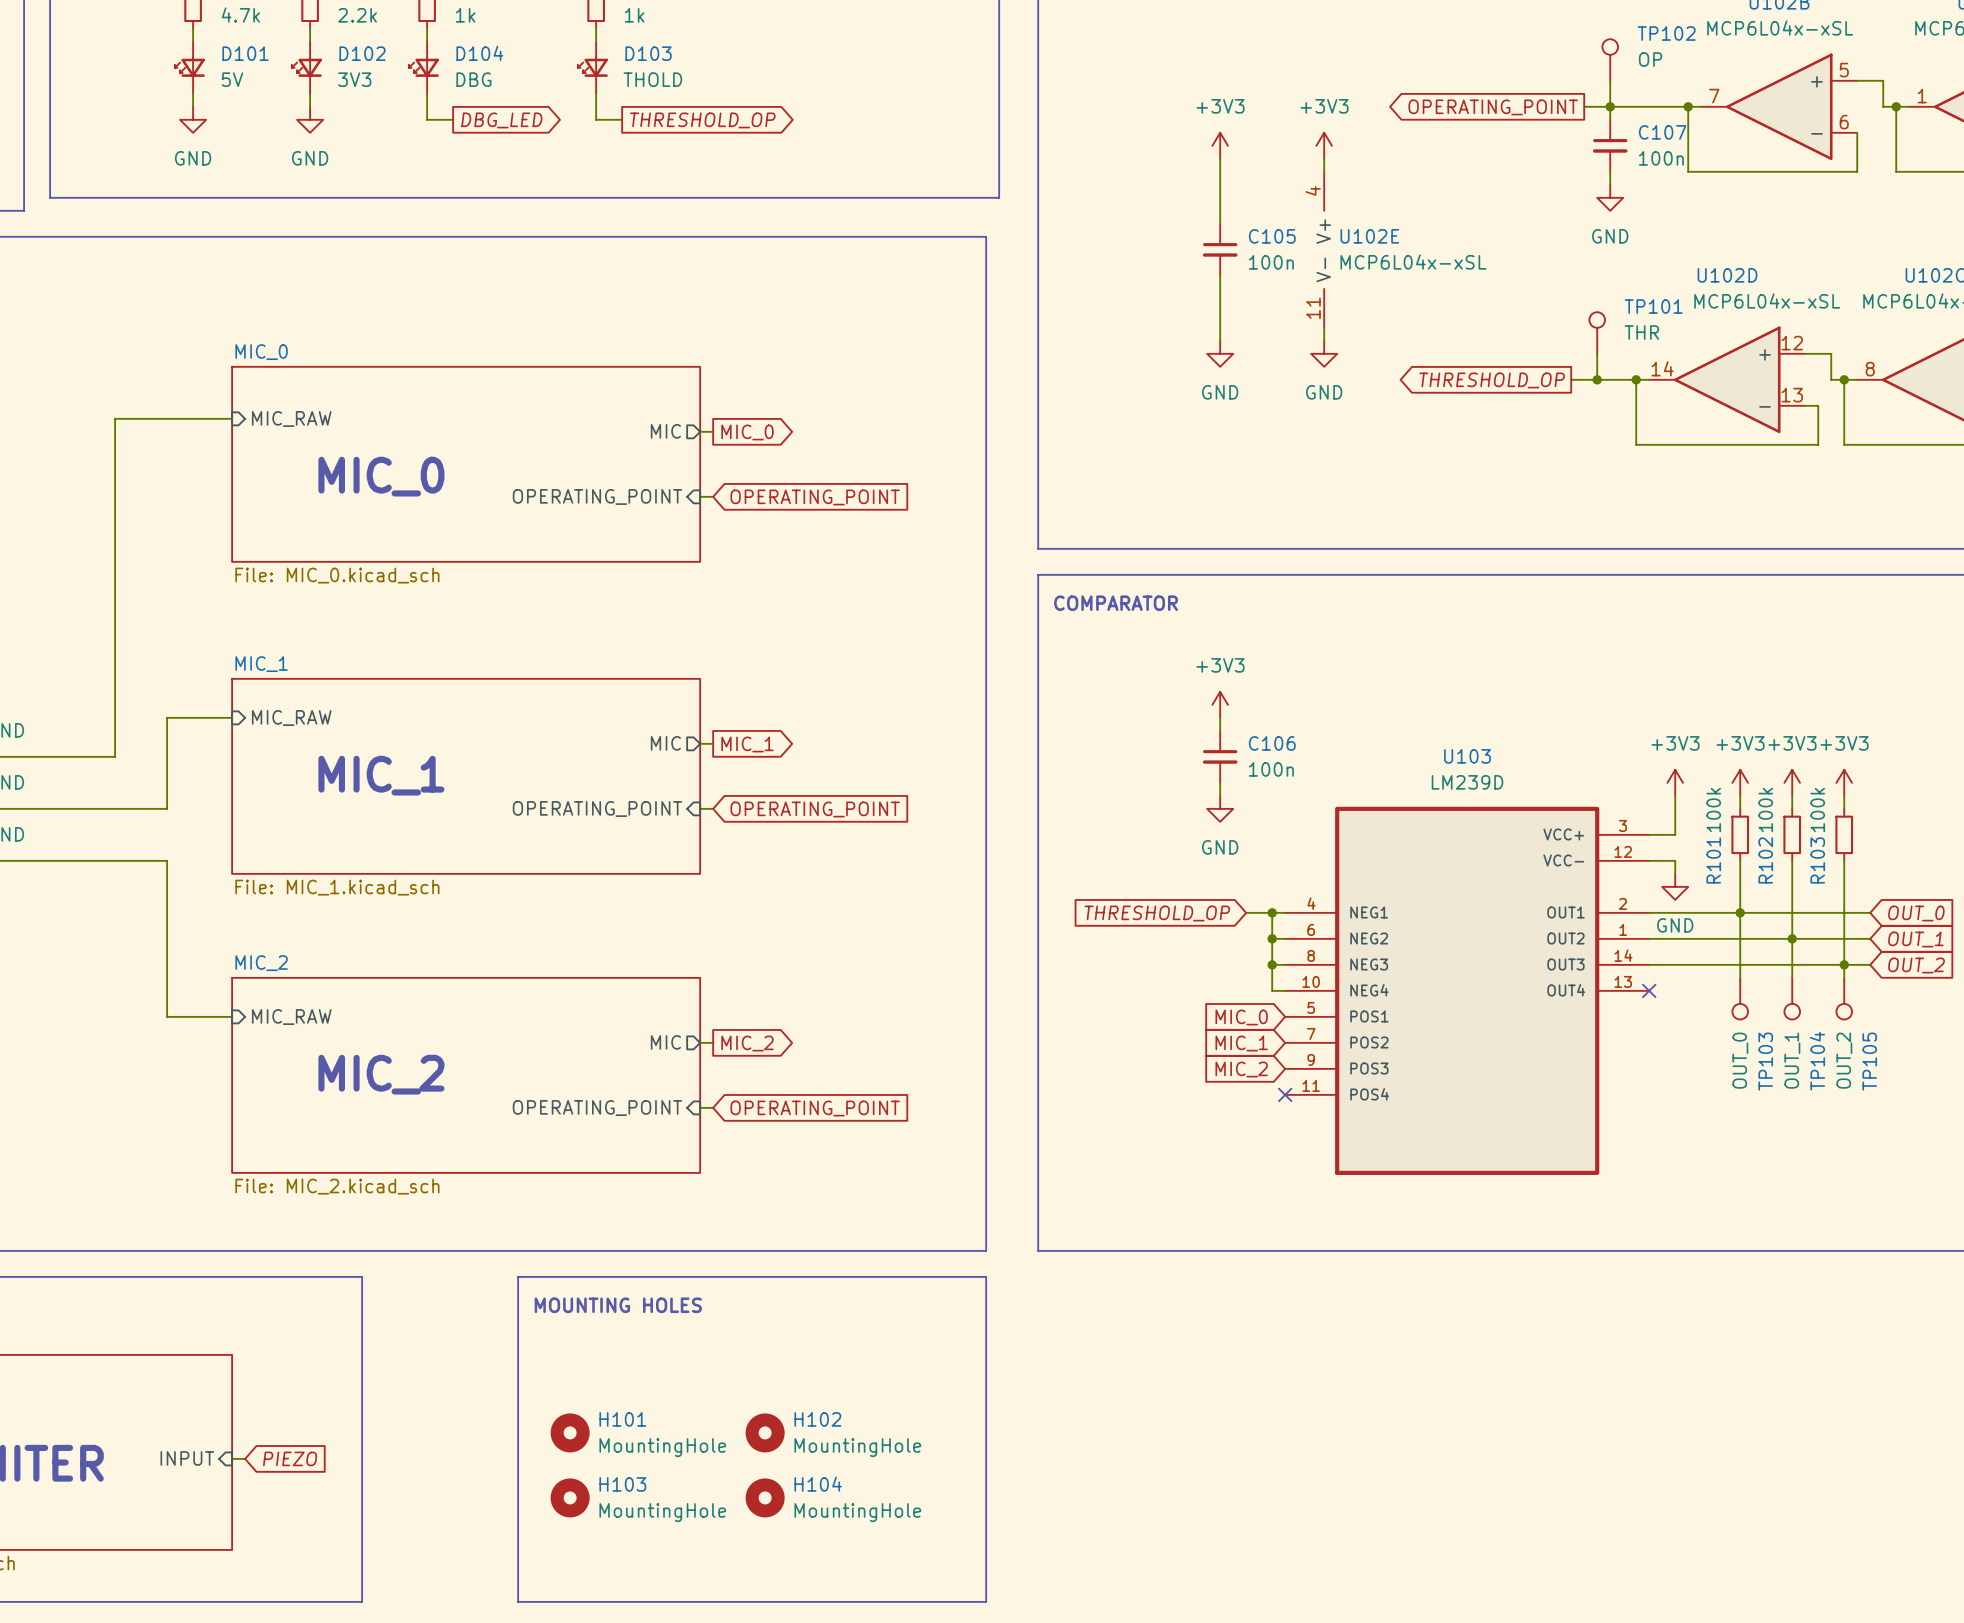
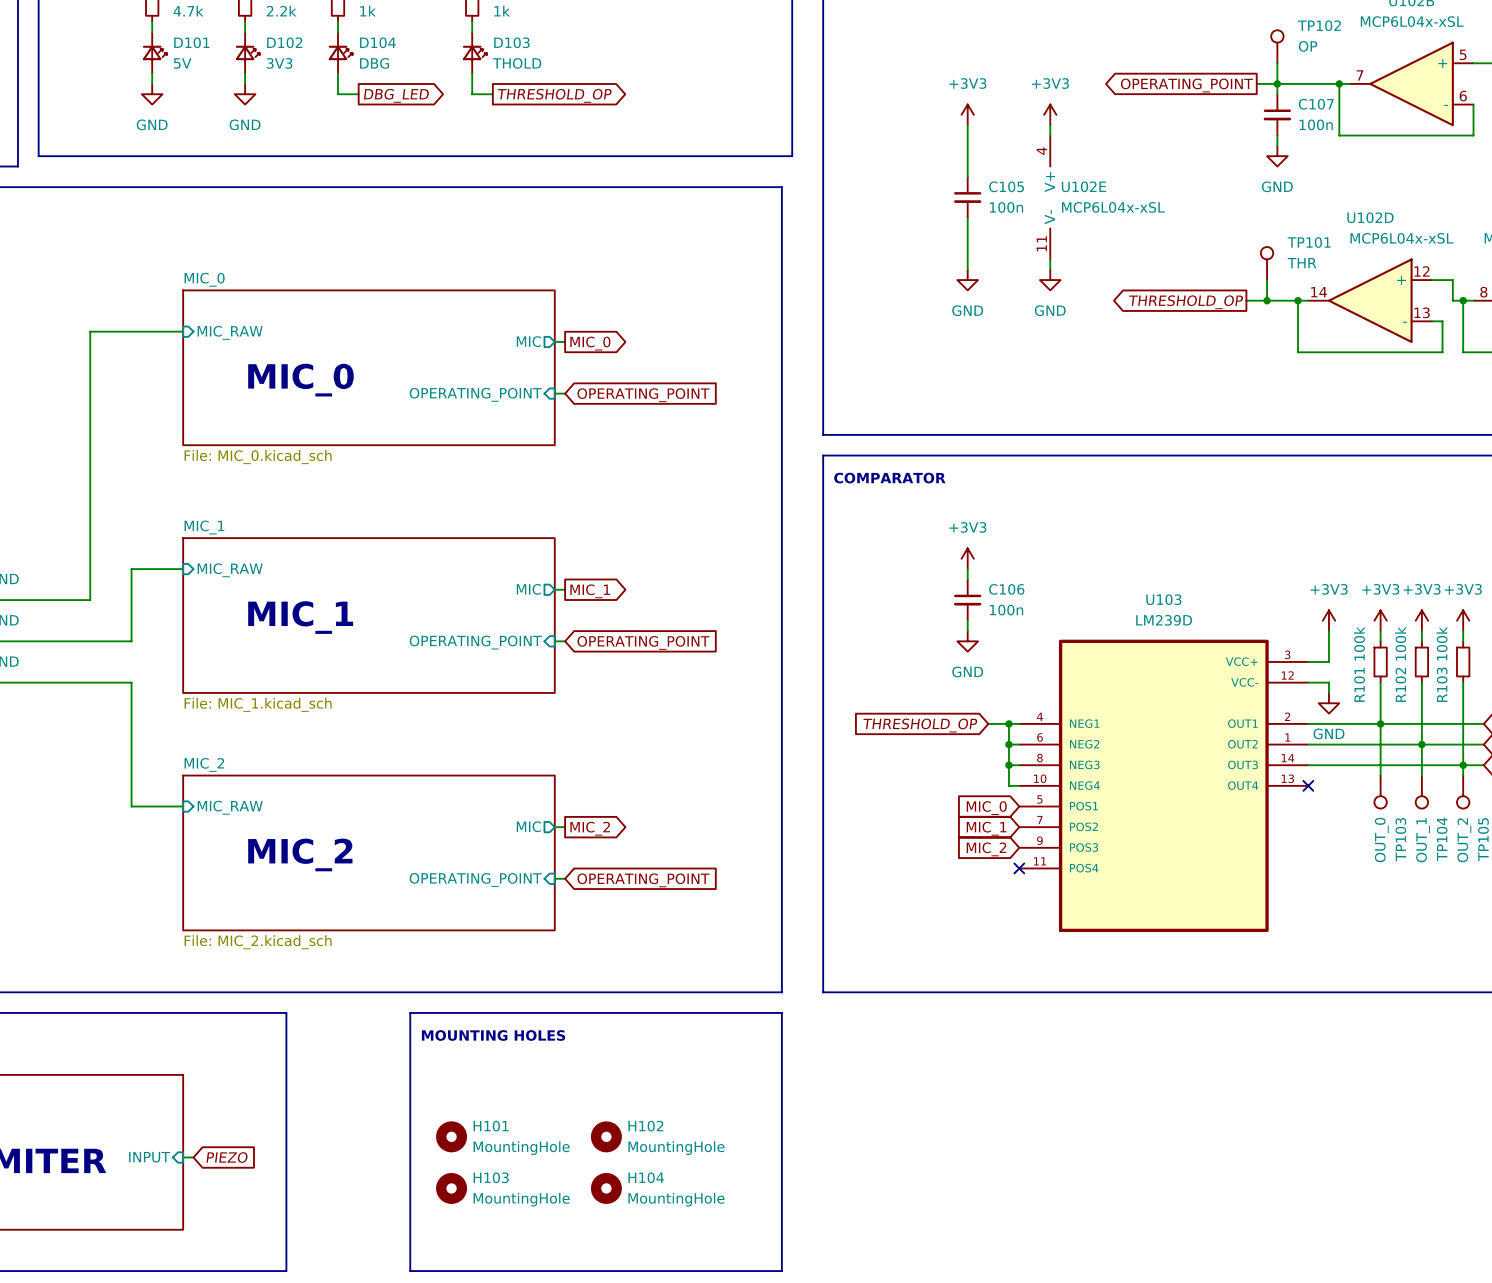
D101 rotation: 0° (189, 67) -> 180° (154, 53)
D102 rotation: 0° (306, 67) -> 180° (247, 53)
D104 rotation: 0° (423, 67) -> 180° (340, 53)
D103 rotation: 0° (592, 67) -> 180° (474, 53)

